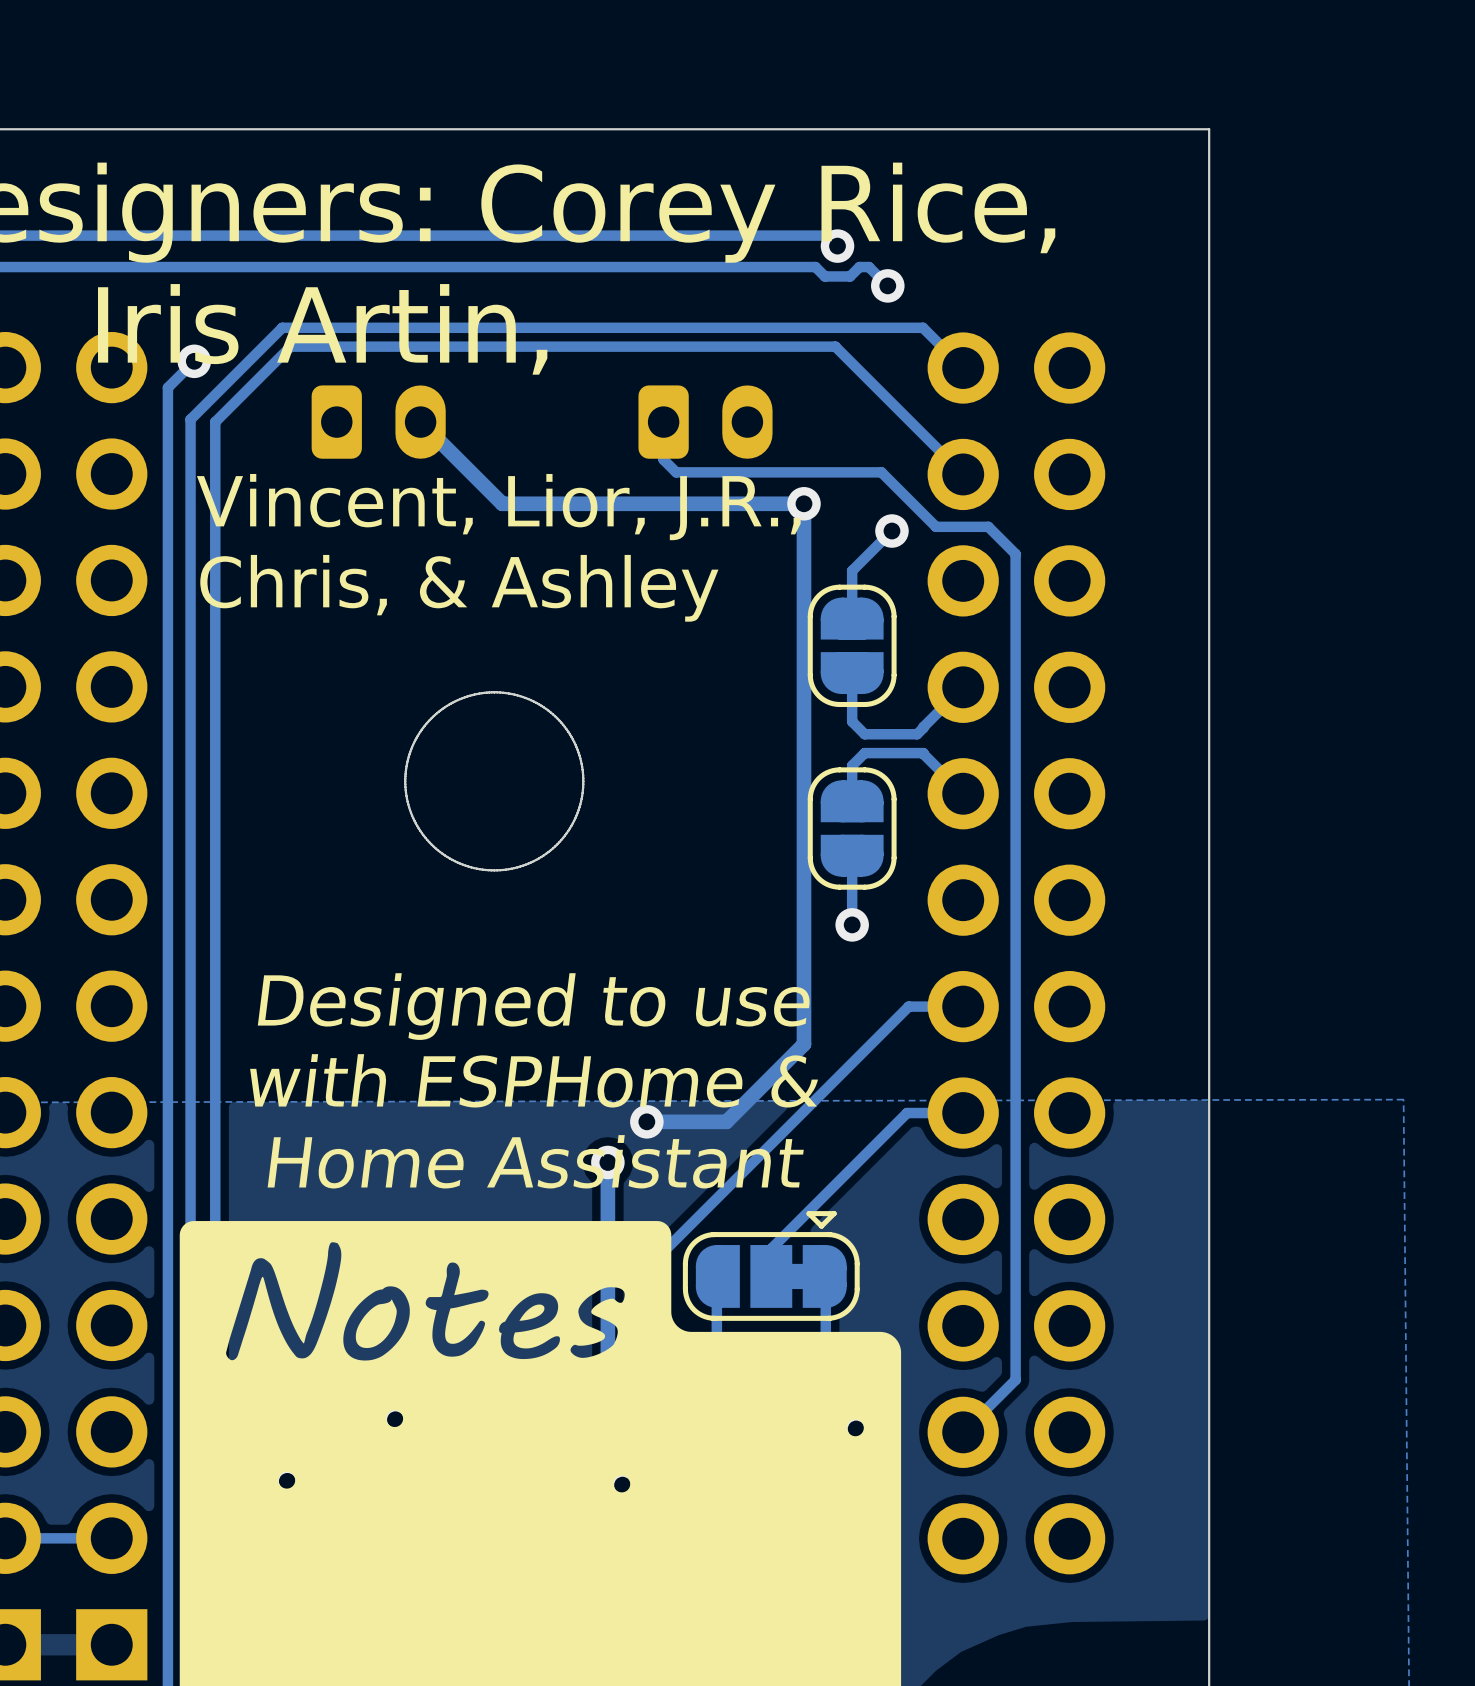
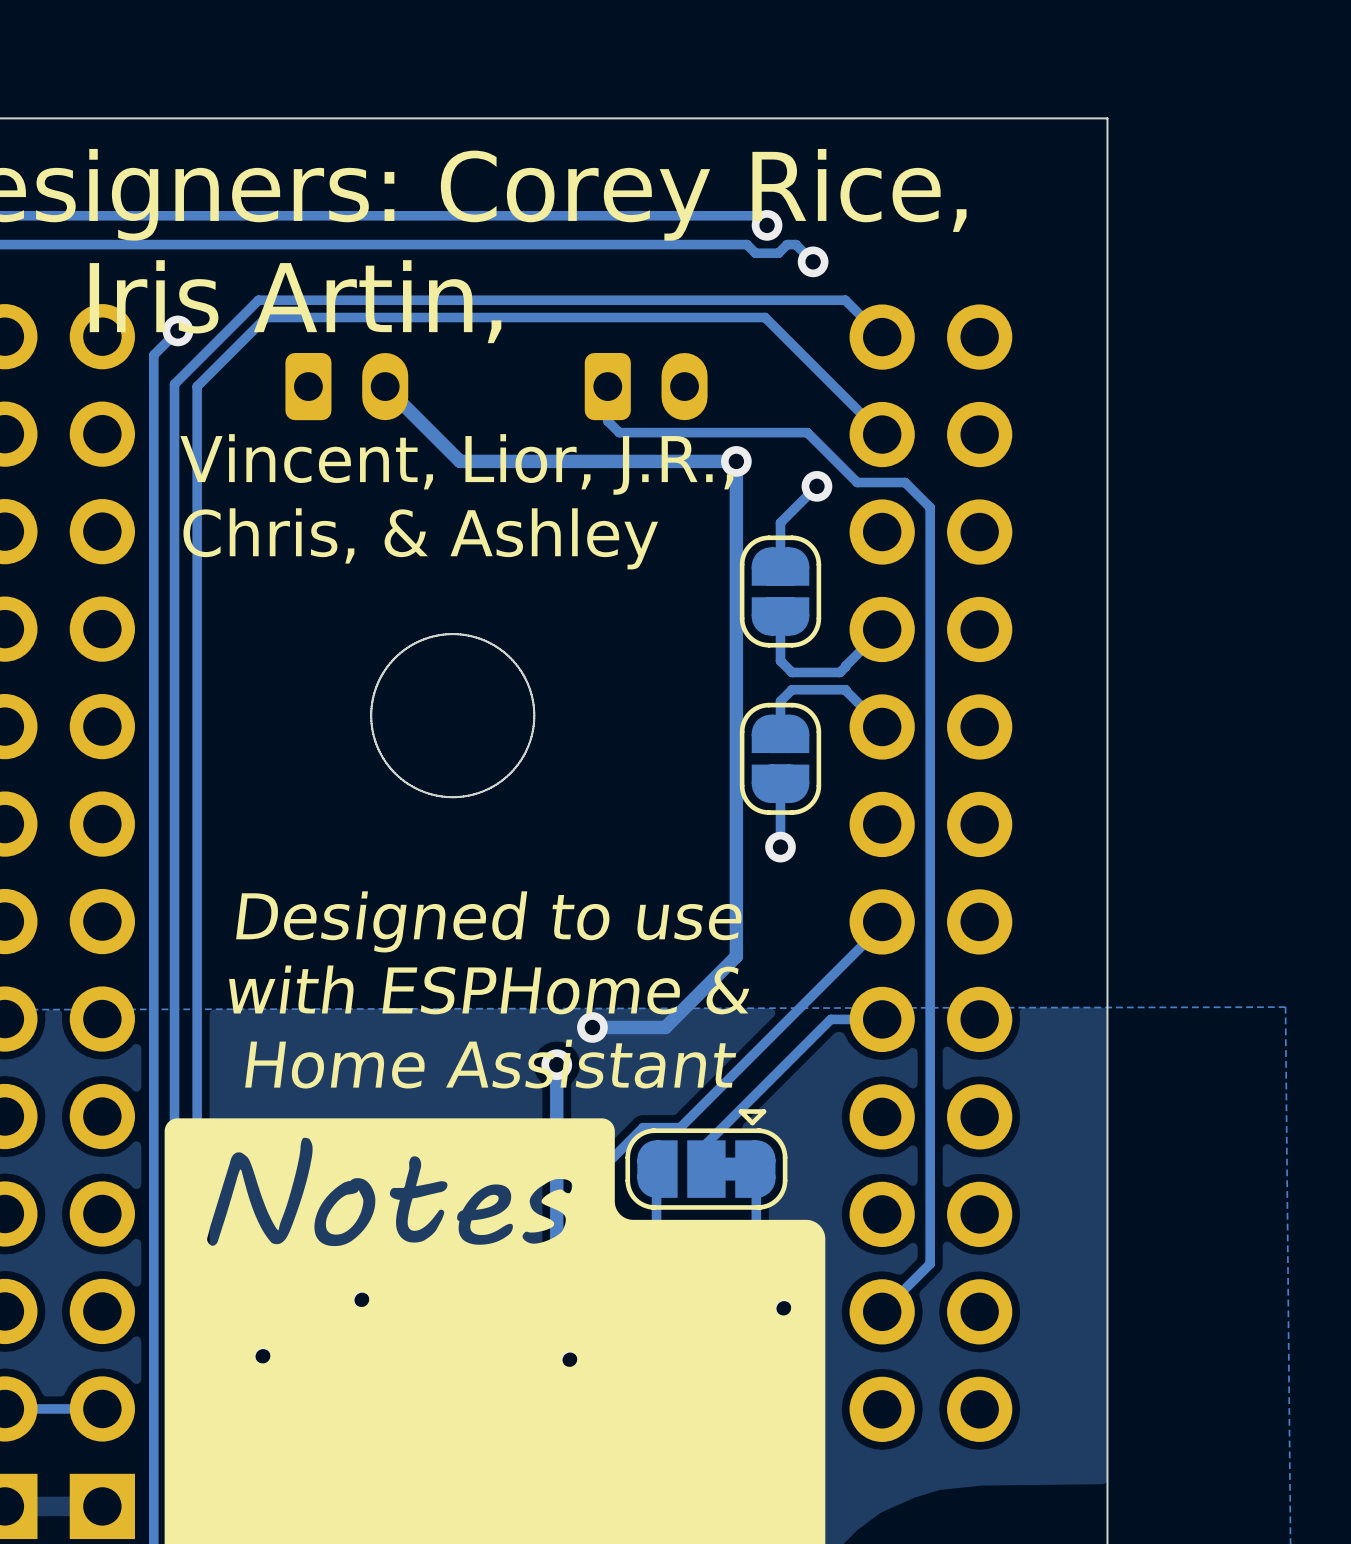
track: (963, 1006) (908, 1006) (661, 1253) (661, 1271) -> (882, 921) (882, 925) (680, 1127) (643, 1127) (606, 1164)

